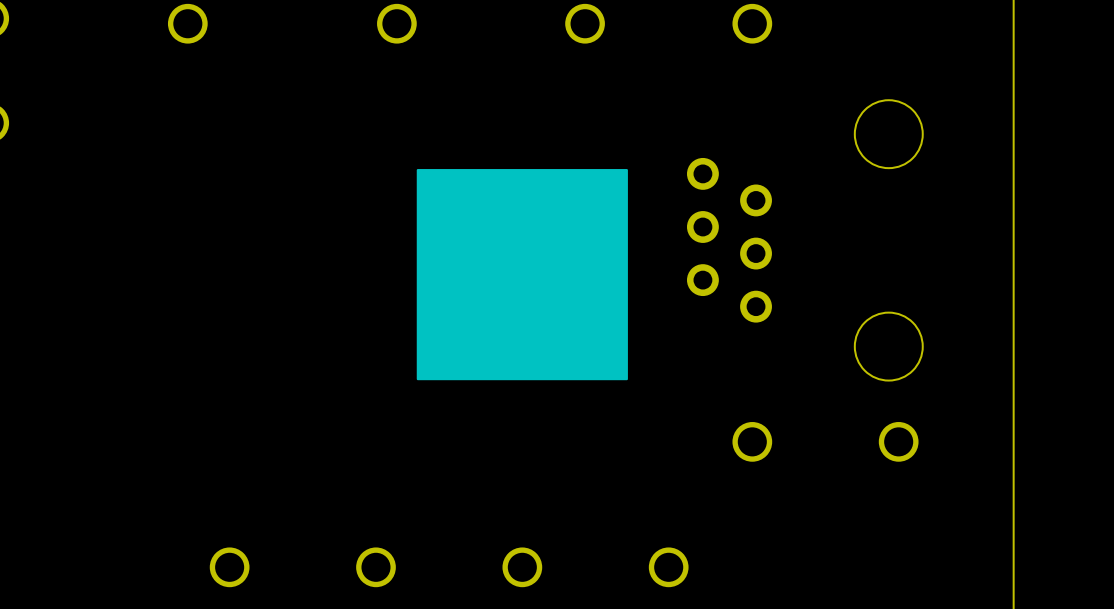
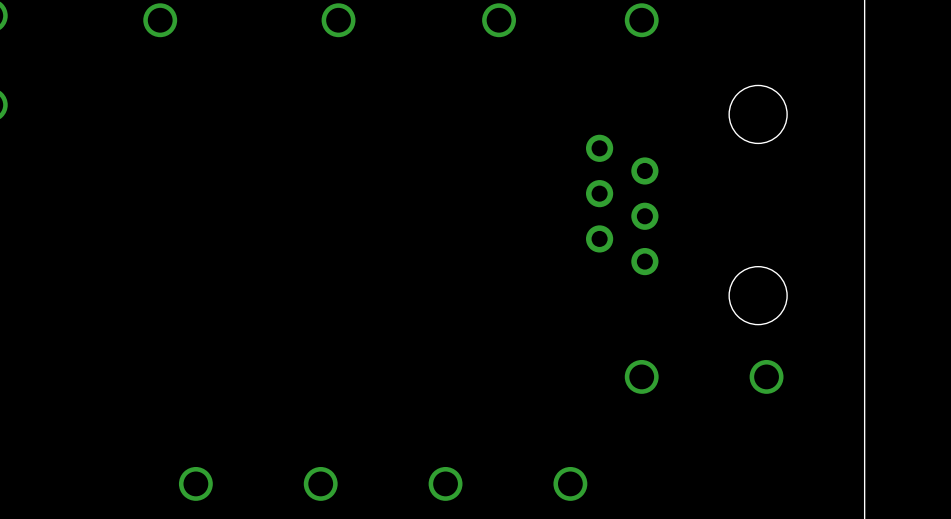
drawing: [416, 169, 628, 381] -> none

